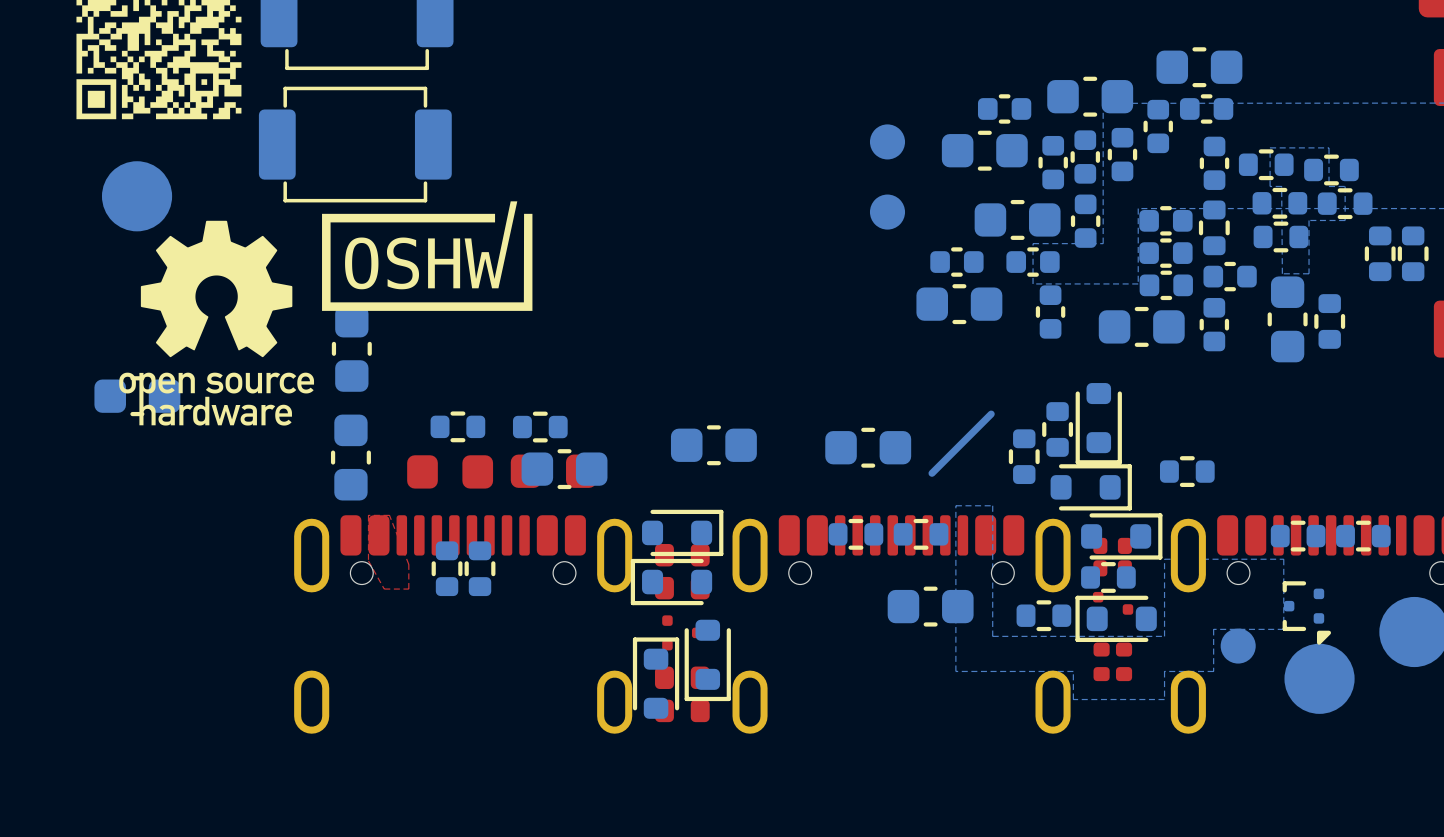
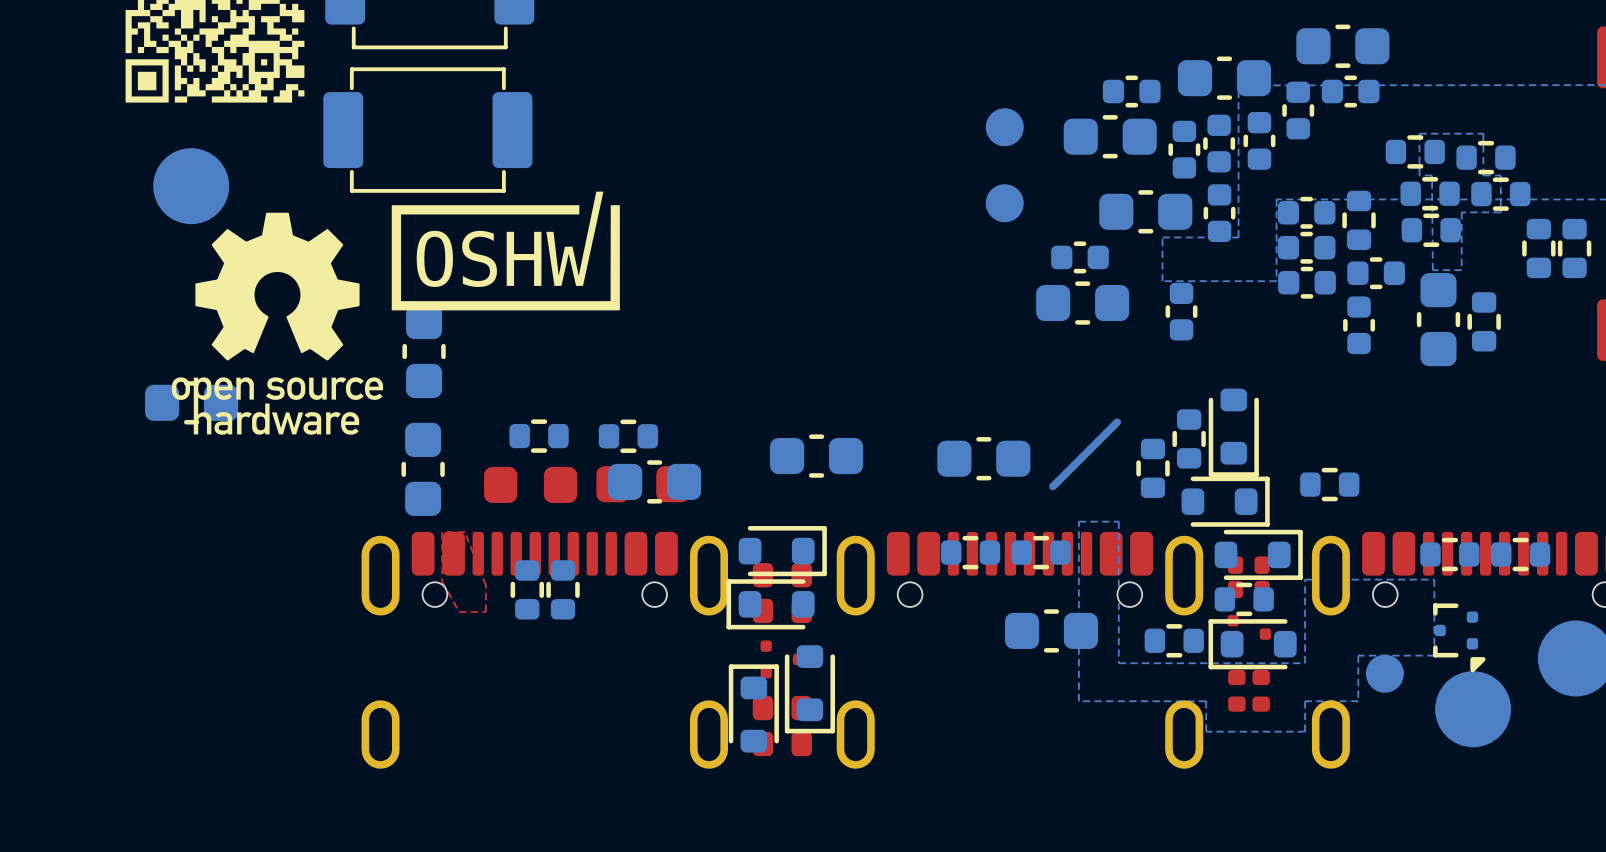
part: (1214, 163) -> none
part: (1033, 262) -> none
part: (1141, 326) -> none

